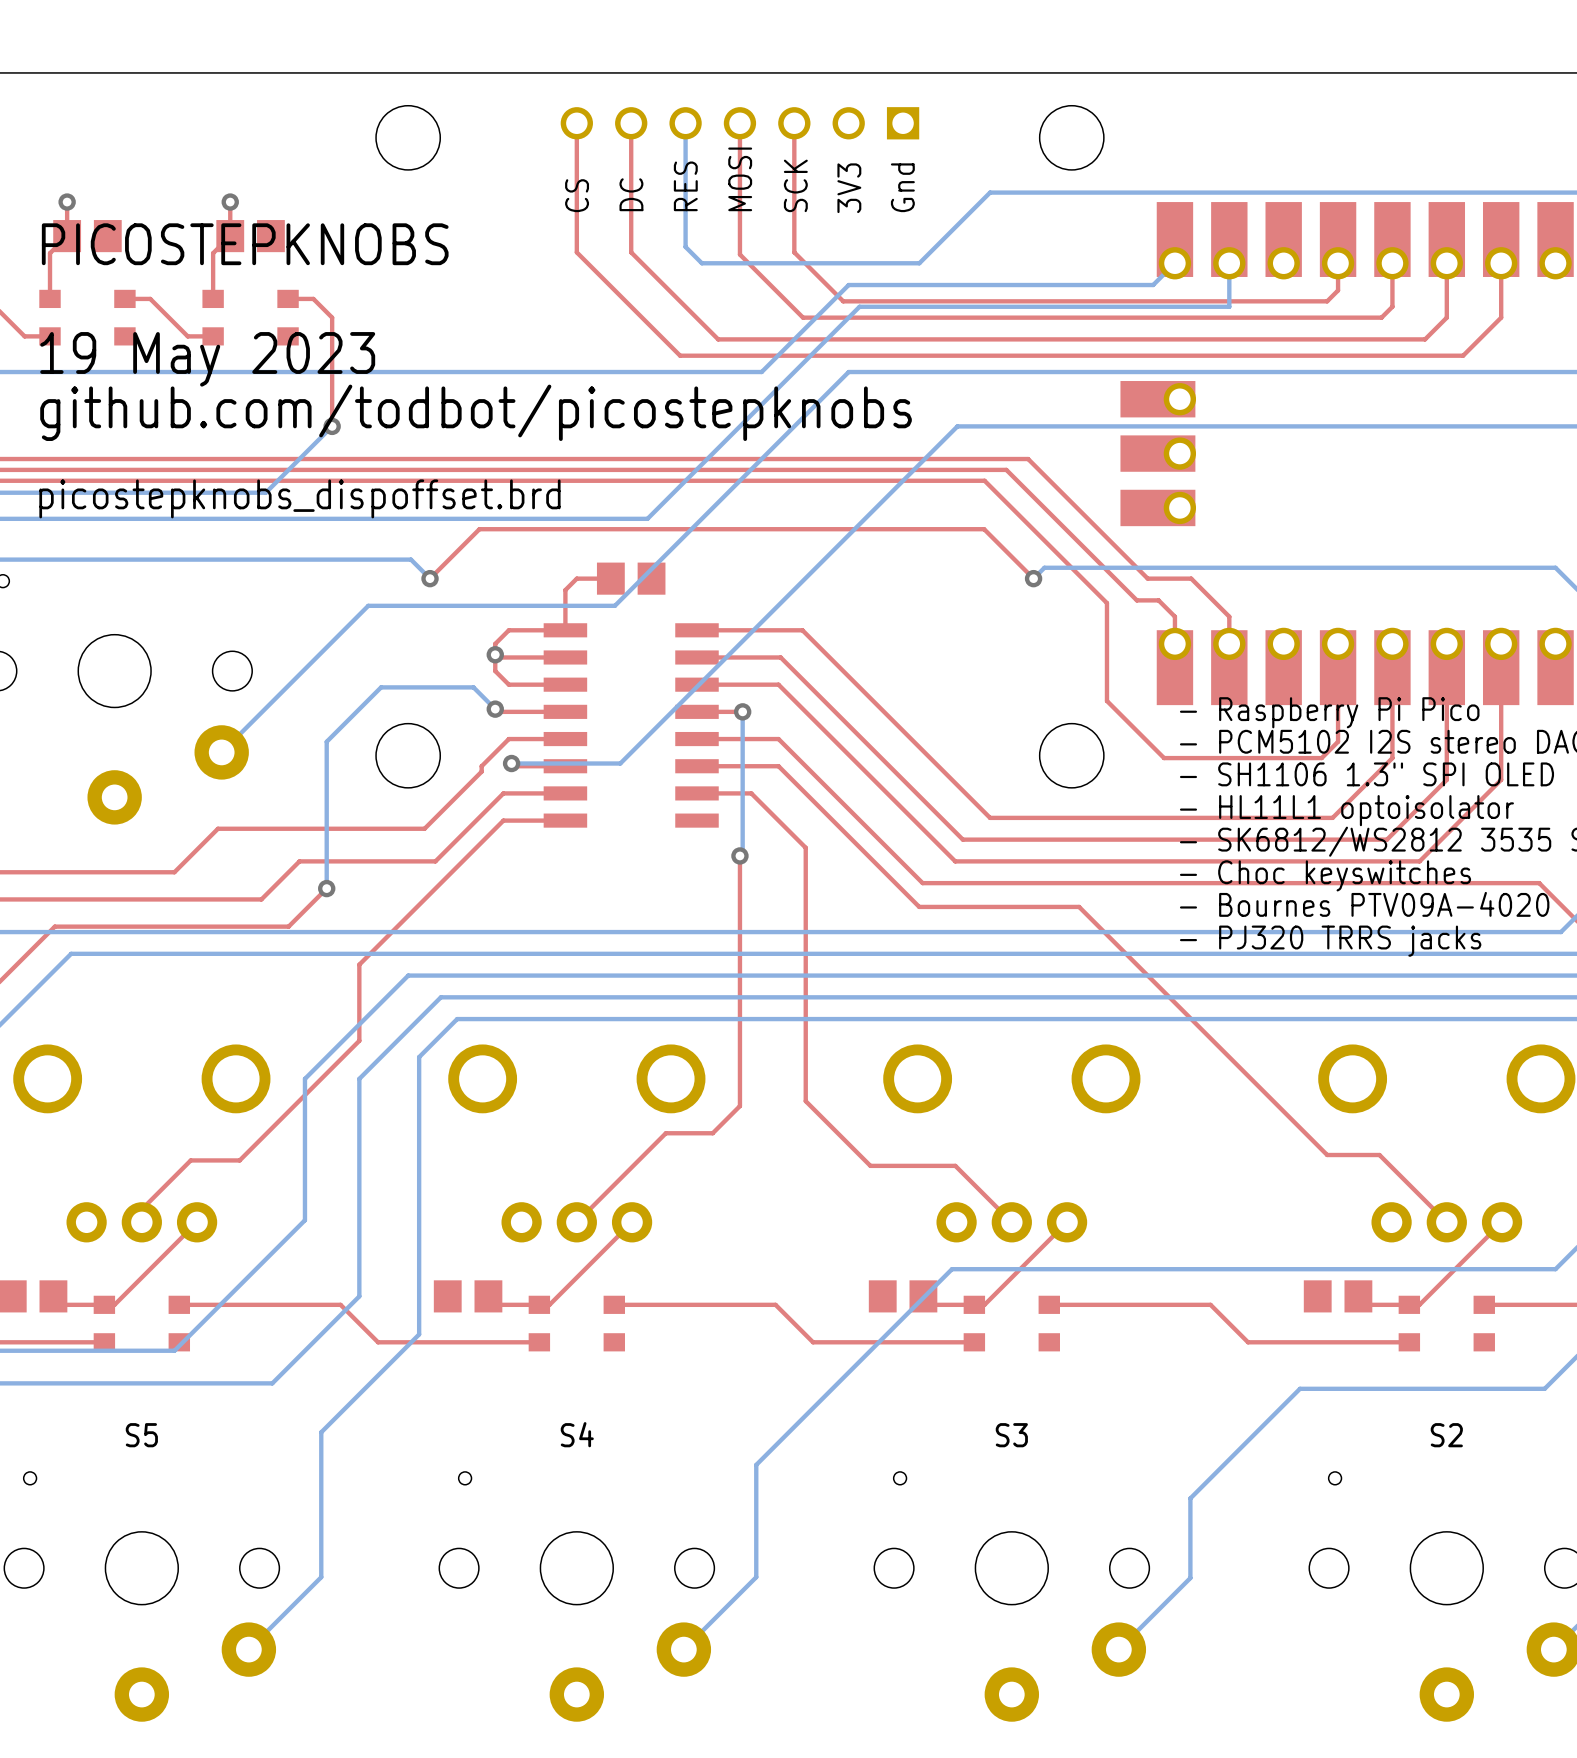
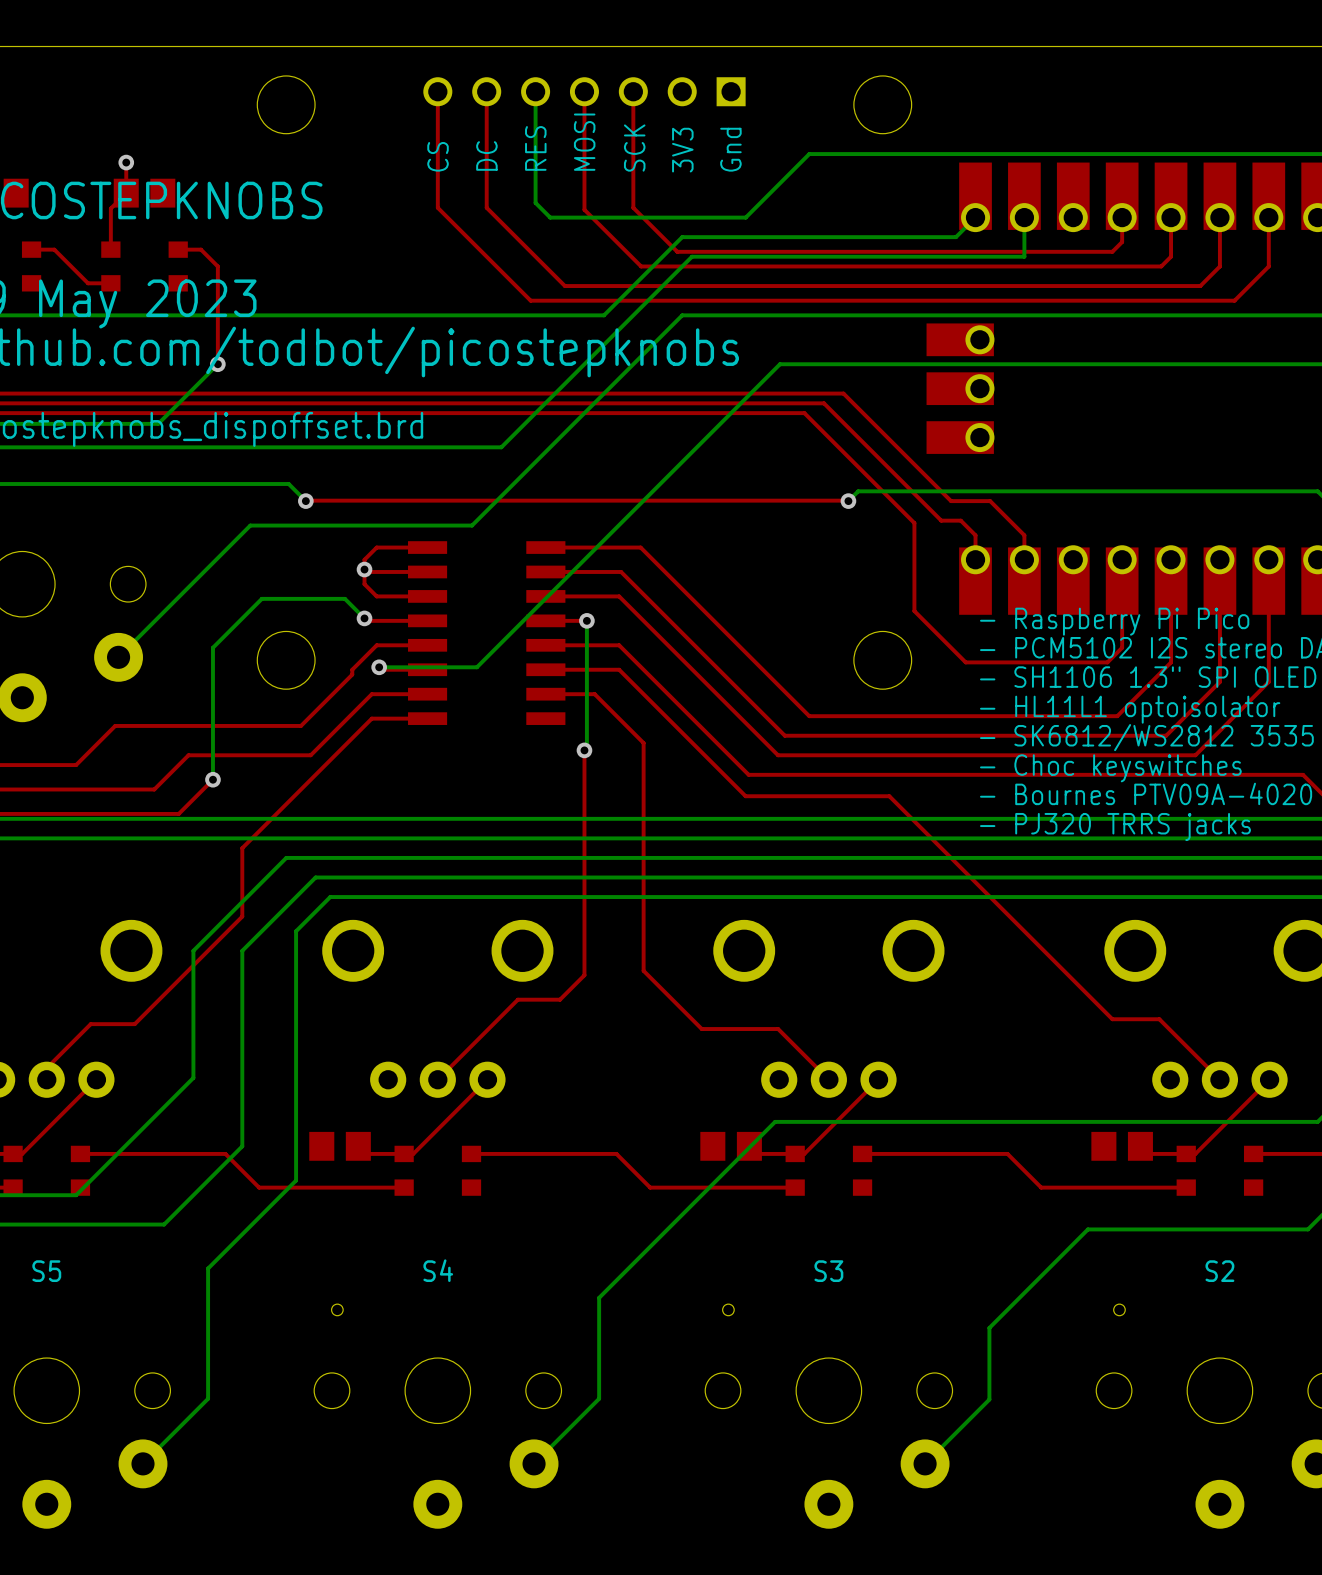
top track: (610, 578) (576, 578) (565, 590) (565, 630) -> none
part: (631, 578) -> none
top track: (1033, 578) (984, 529) (479, 529) (430, 578) -> (847, 500) (306, 500)

